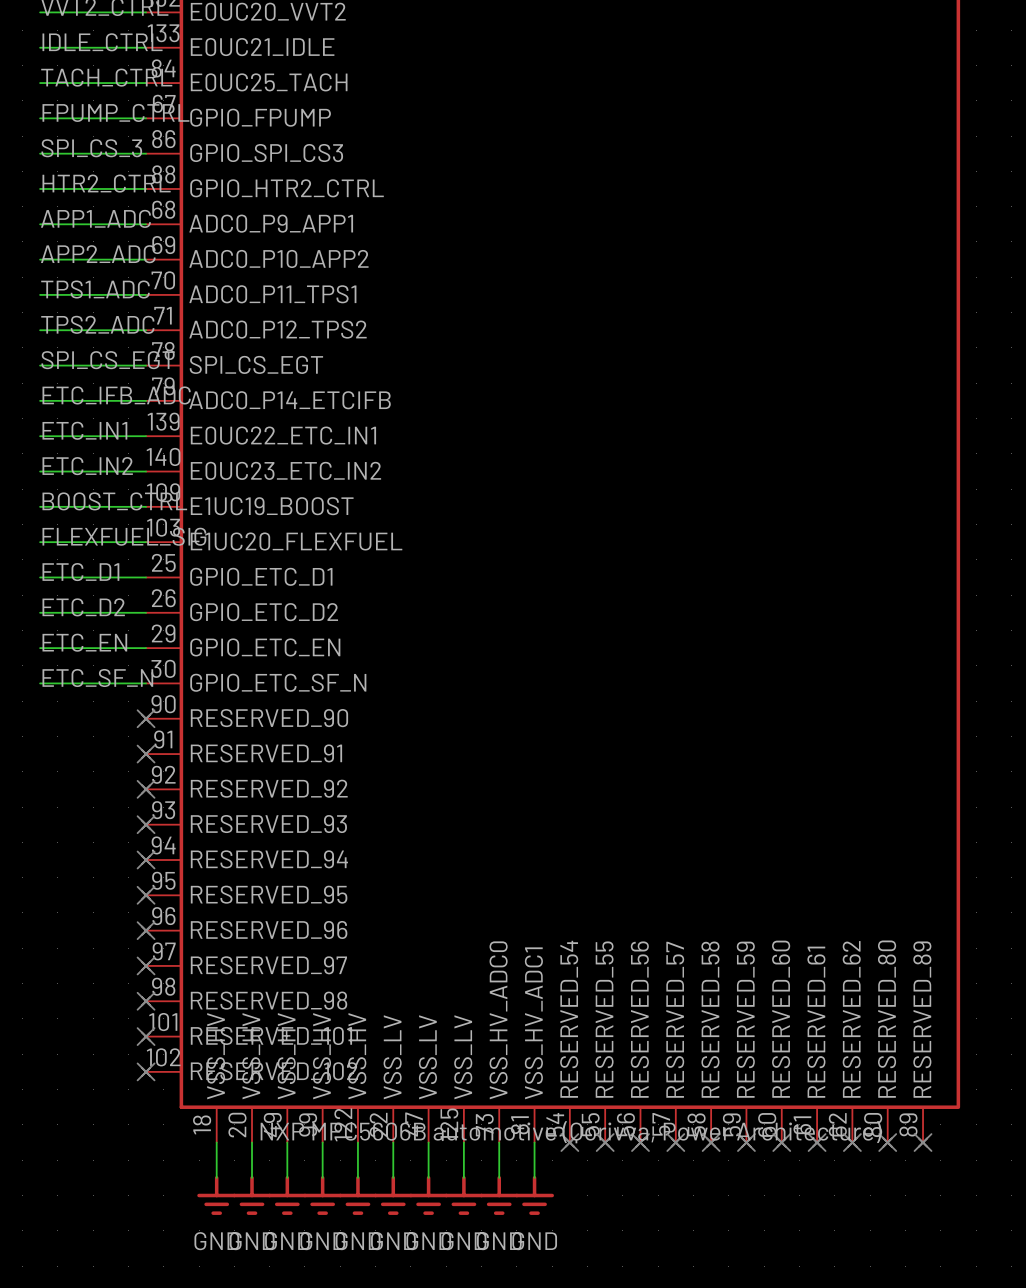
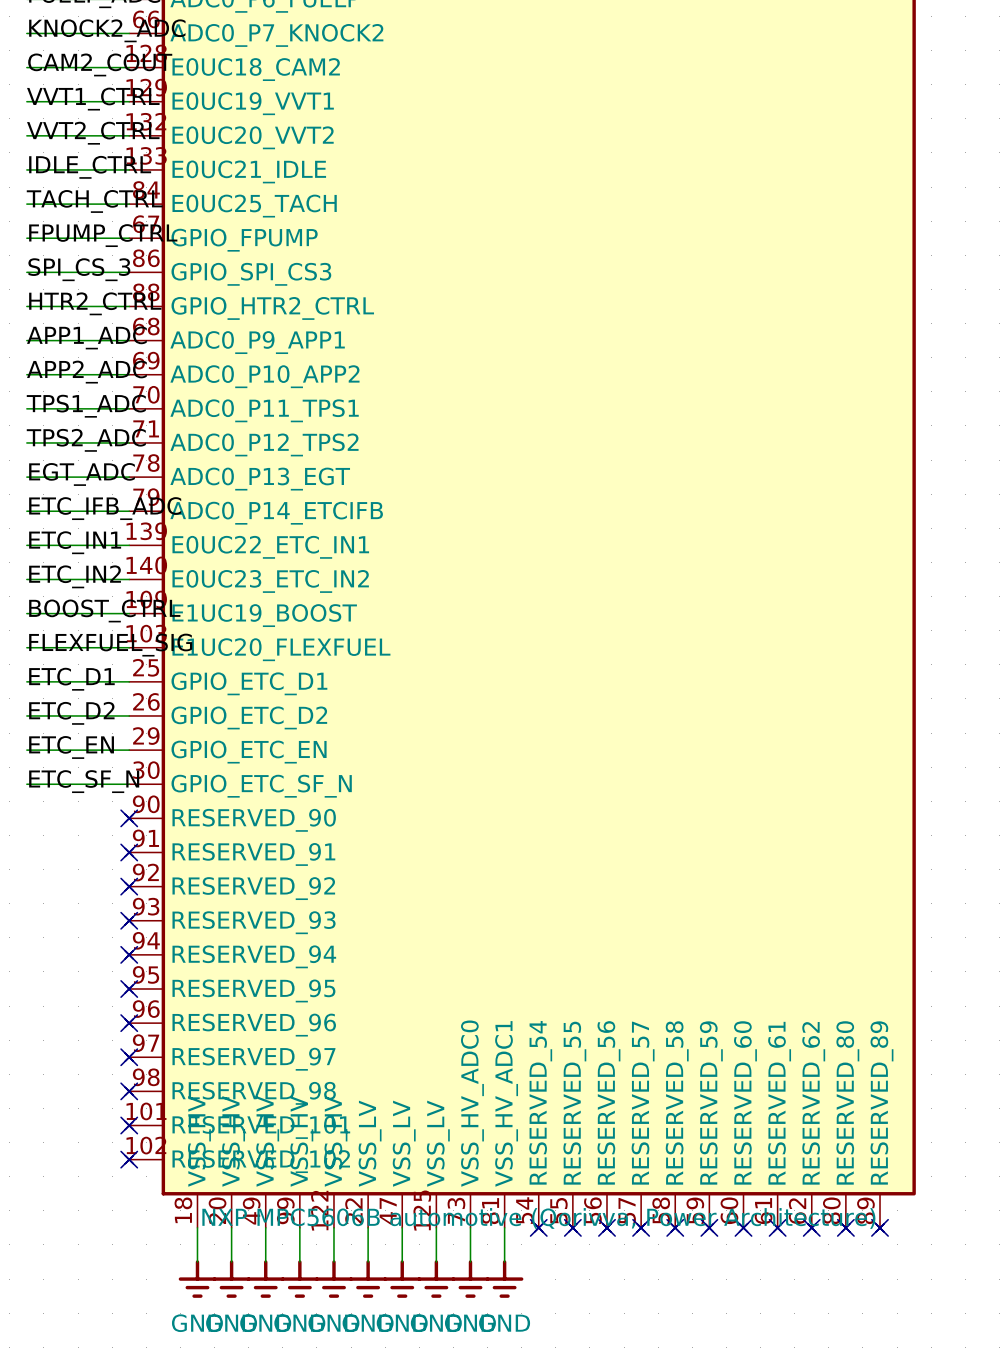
label: SPI_CS_EGT (108, 360) -> EGT_ADC (82, 474)
part pin name: SPI_CS_EGT (256, 364) -> ADC0_P13_EGT (260, 479)

